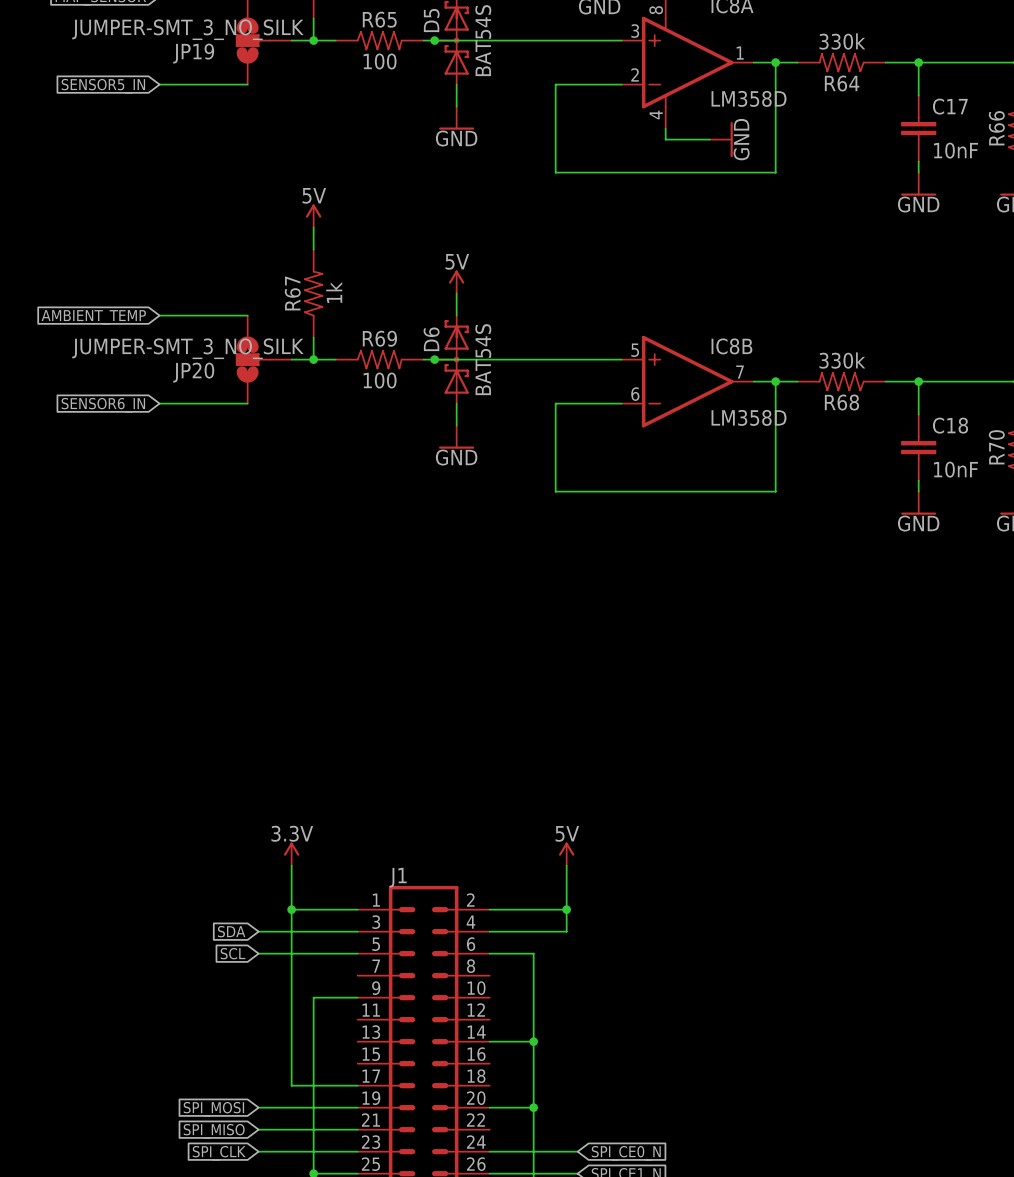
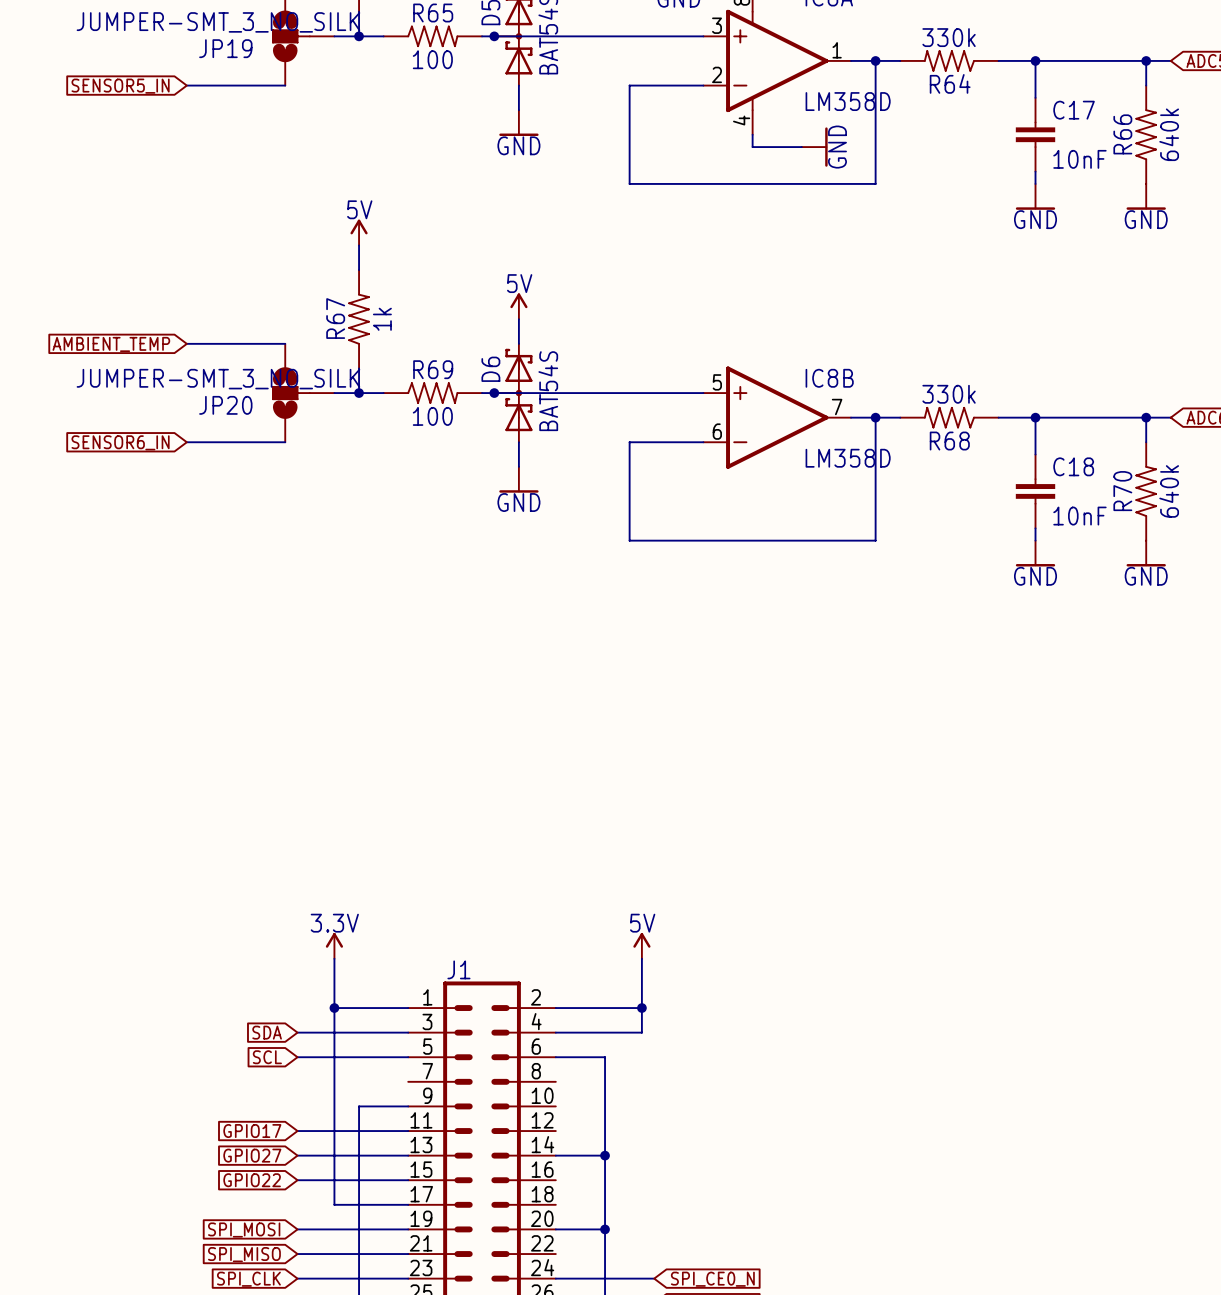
global label: none -> GPIO17 (252, 1131)
wire: none -> (297, 1131) (408, 1131)
global label: none -> GPIO27 (252, 1155)
wire: none -> (297, 1155) (408, 1155)
global label: none -> GPIO22 (252, 1180)
wire: none -> (297, 1180) (408, 1180)

